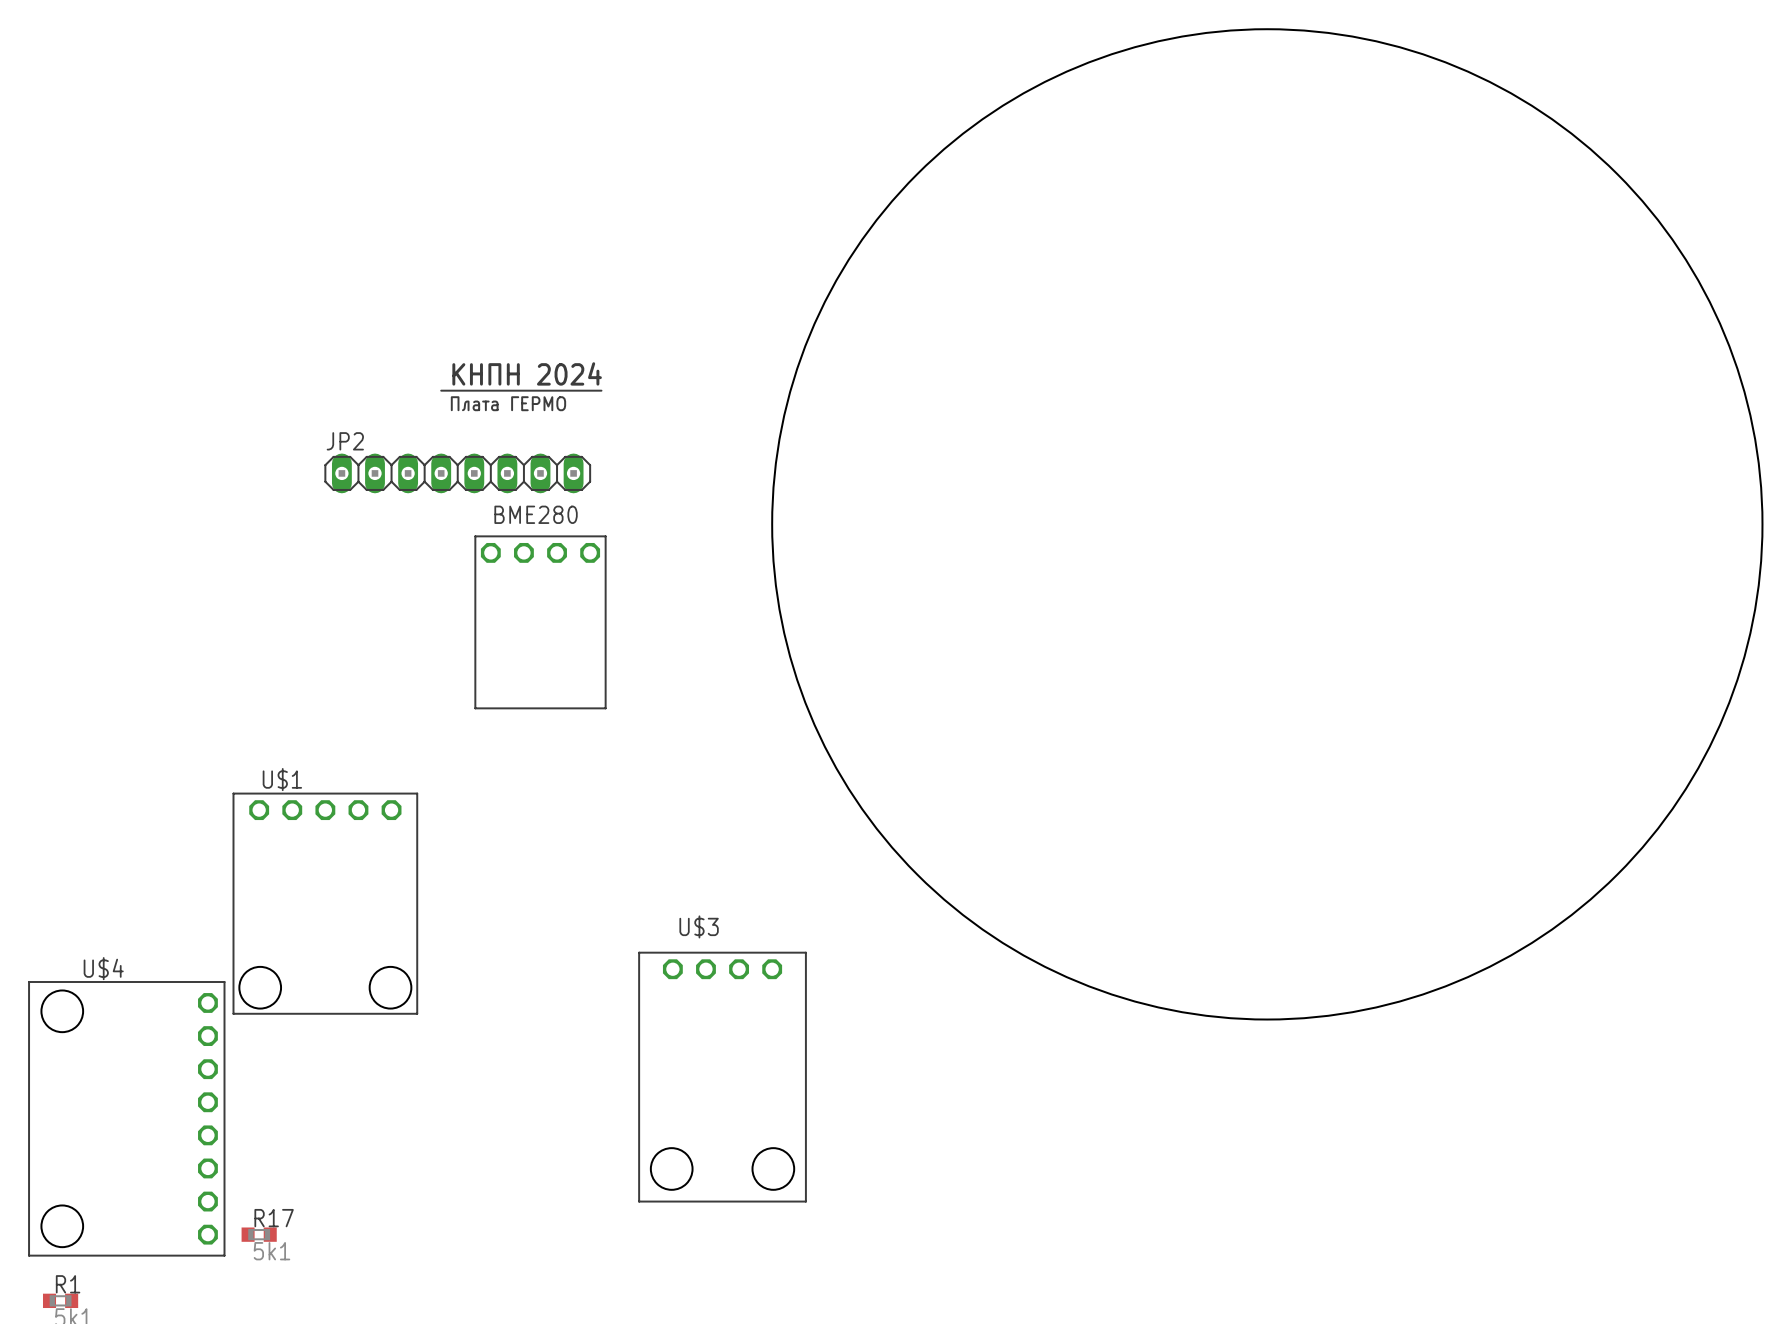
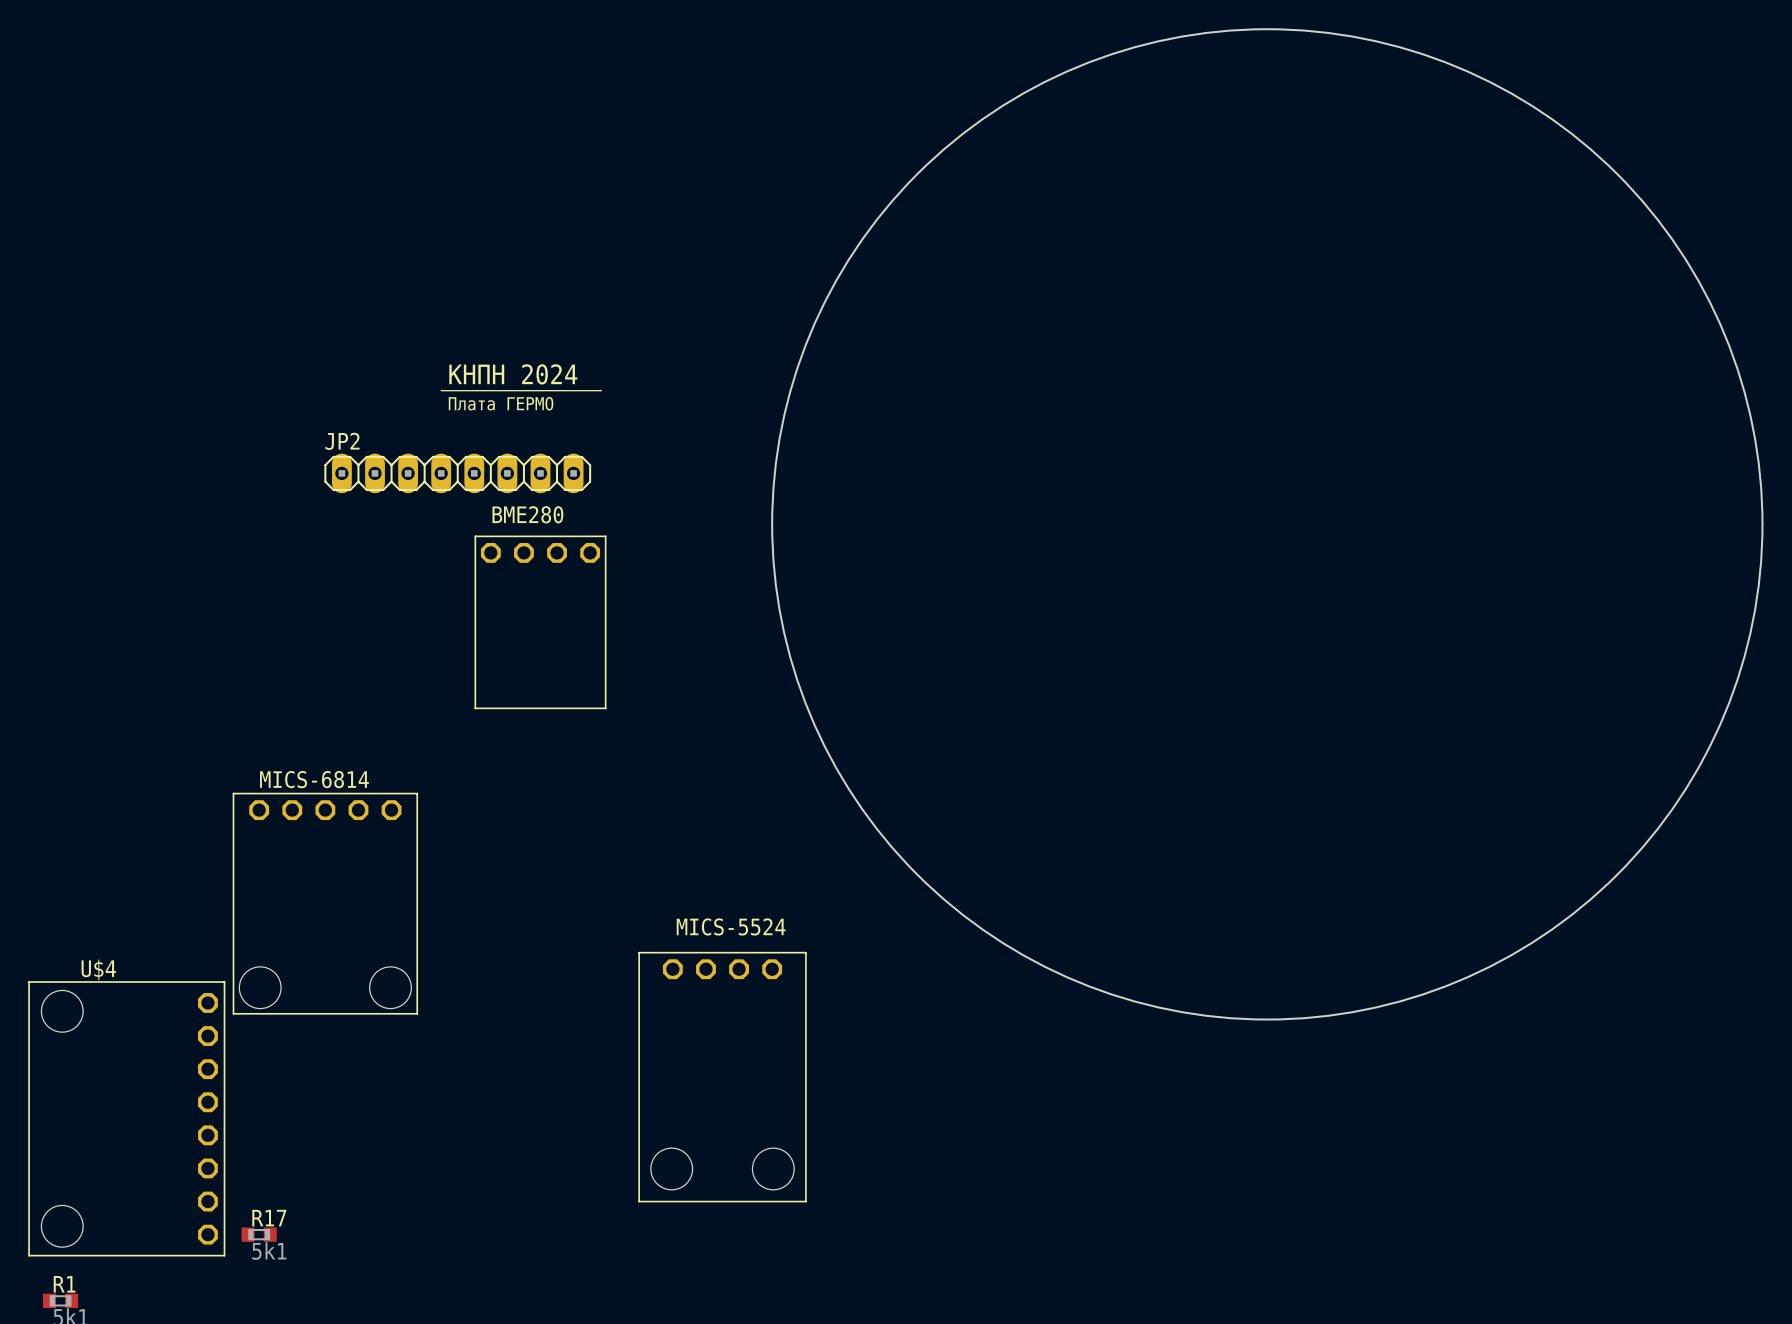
U$1 name: U$1 (282, 779) -> MICS-6814 (314, 779)
U$3 name: U$3 (699, 926) -> MICS-5524 (731, 926)

